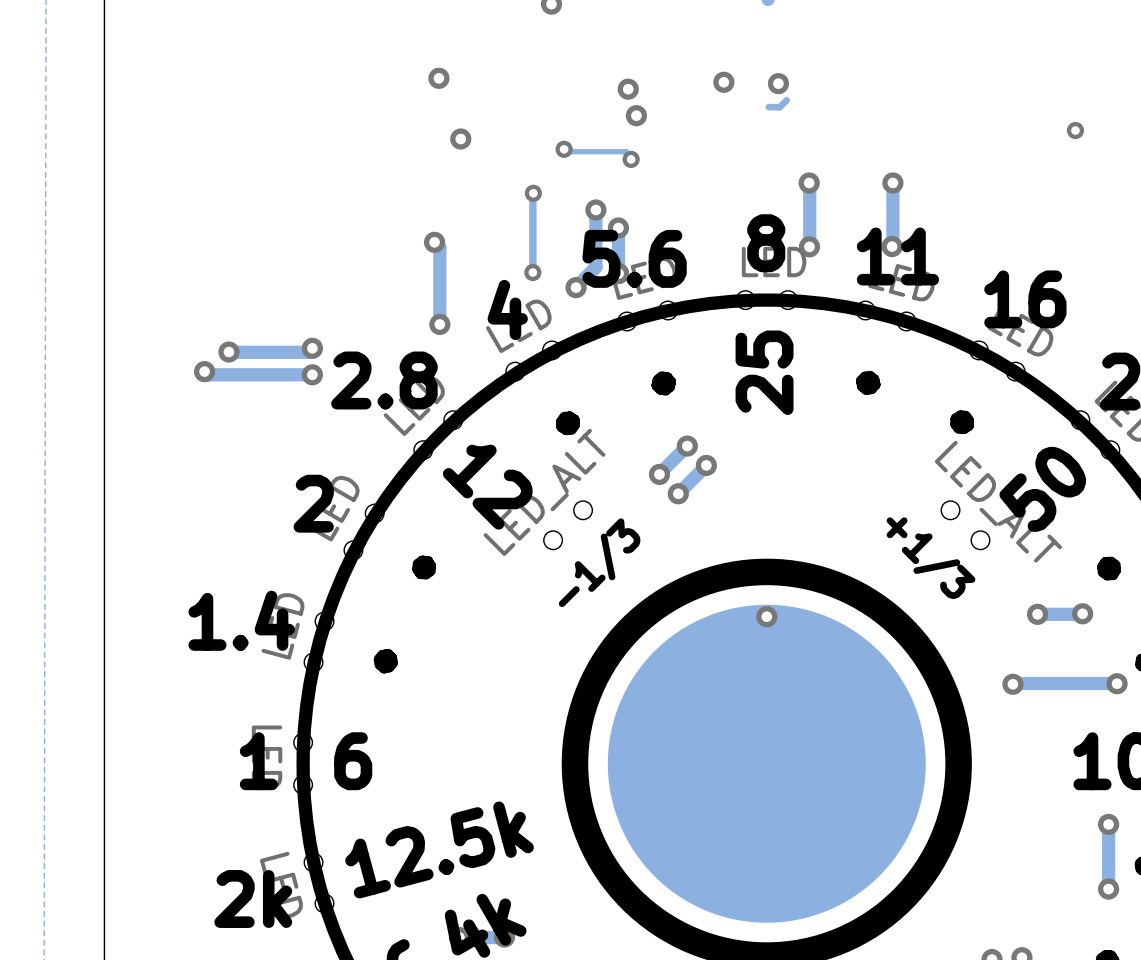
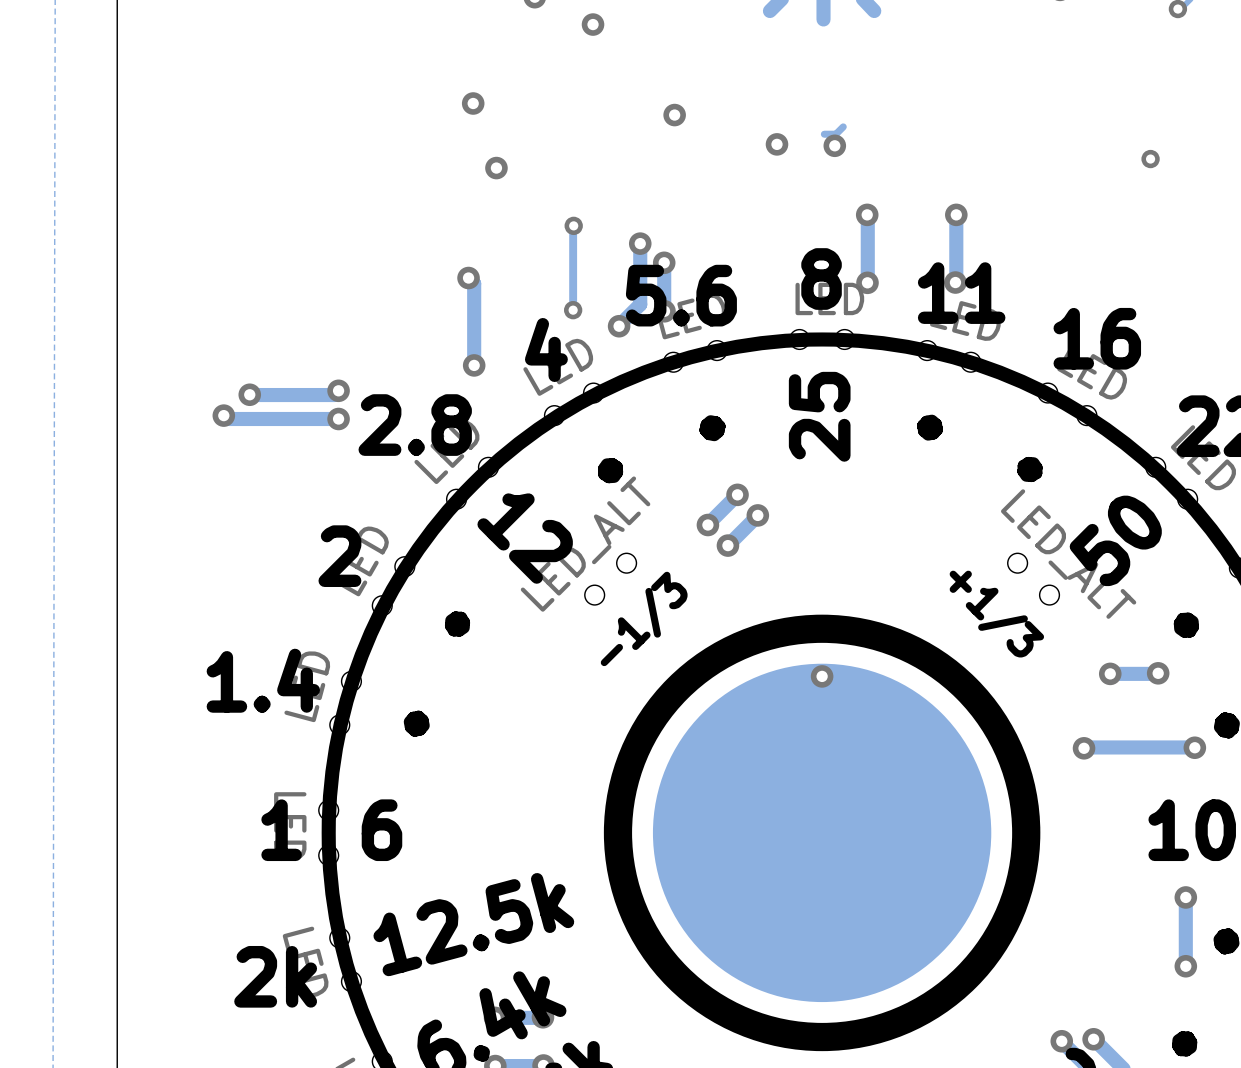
via: (723, 82) -> none
via: (778, 83) -> none
via: (636, 115) -> none
via: none -> (776, 144)
via: none -> (834, 145)
via: (564, 149) -> none
track: (559, 151) (626, 151) (626, 154) (631, 159) -> none
via: (631, 159) -> none

